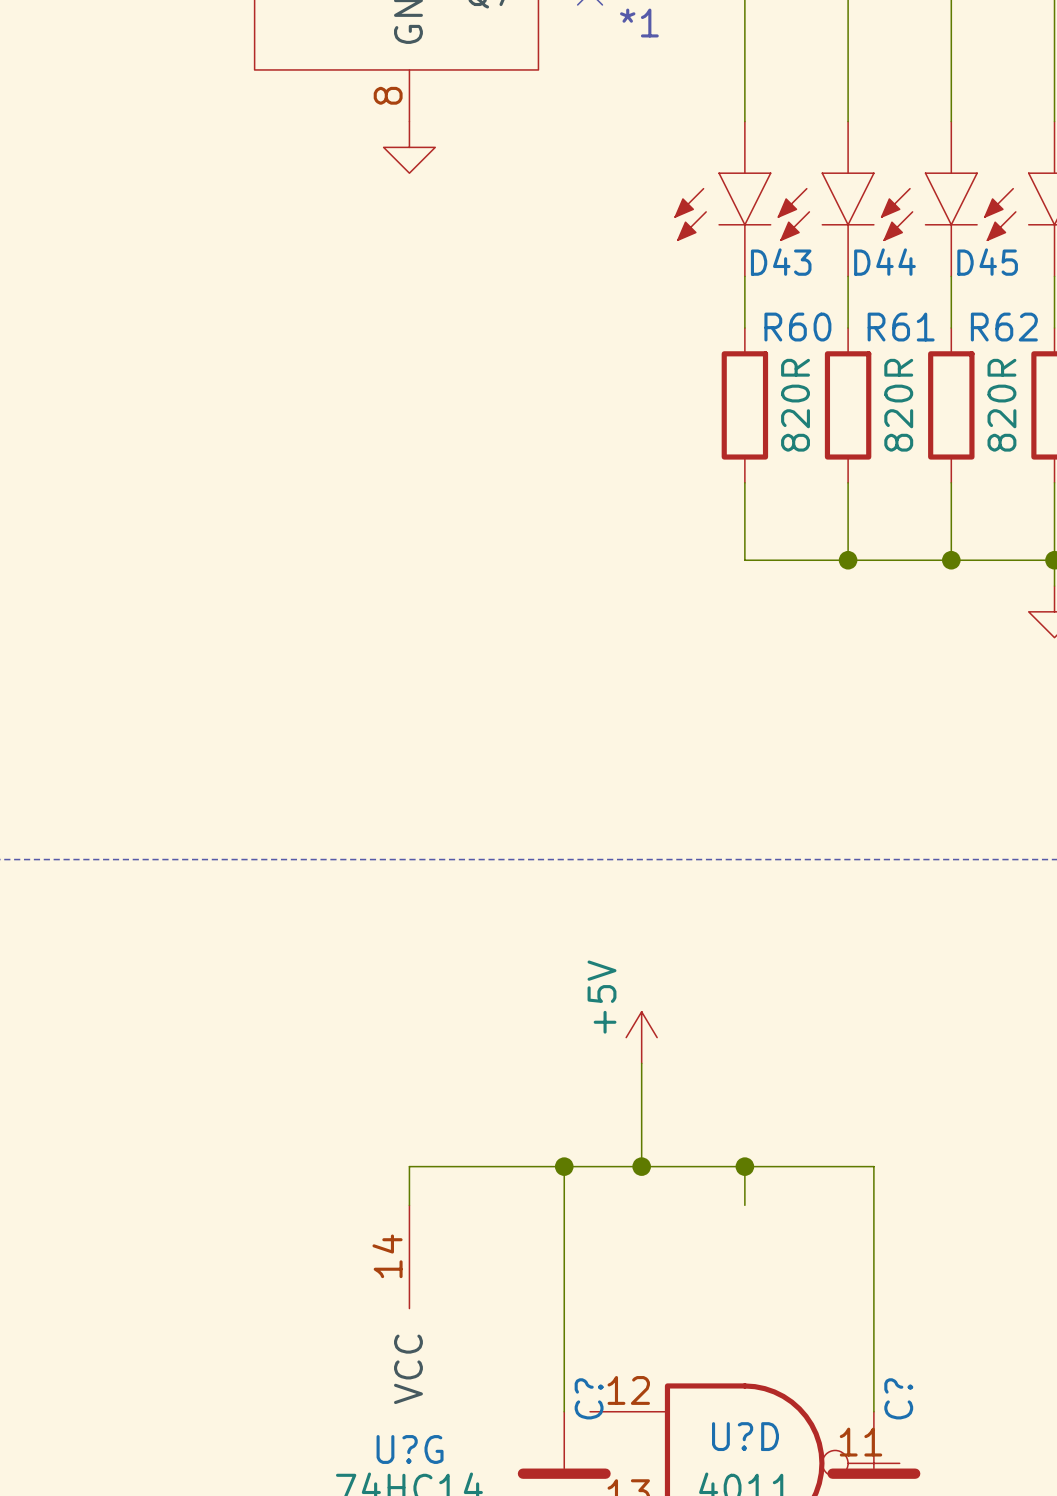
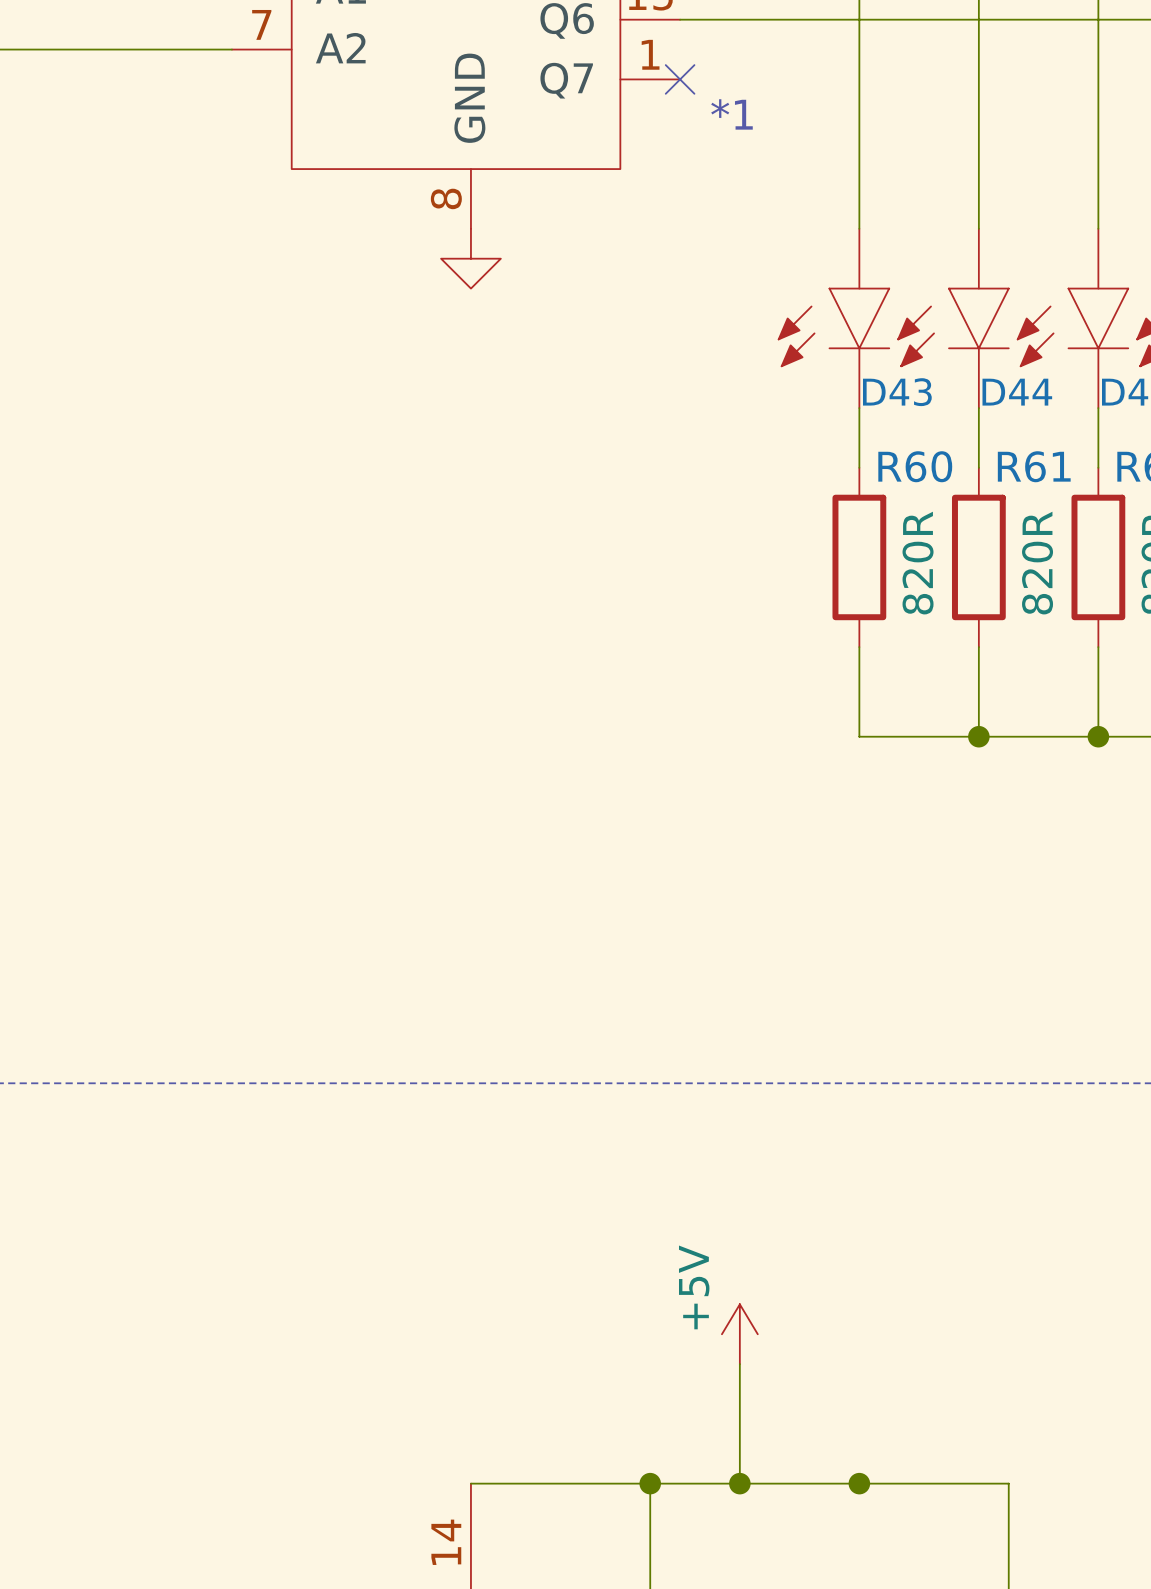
power symbol position: +5V (641, 1037) -> +5V (739, 1334)
wire: (564, 1166) (564, 1205) -> (739, 1438) (739, 1483)
junction position: (564, 1166) -> (650, 1483)
junction position: (641, 1166) -> (739, 1483)
wire: (744, 1166) (744, 1205) -> none
junction position: (744, 1166) -> (859, 1483)
wire: (409, 1205) (409, 1166) (873, 1166) (873, 1205) -> (470, 1483) (1008, 1483)

